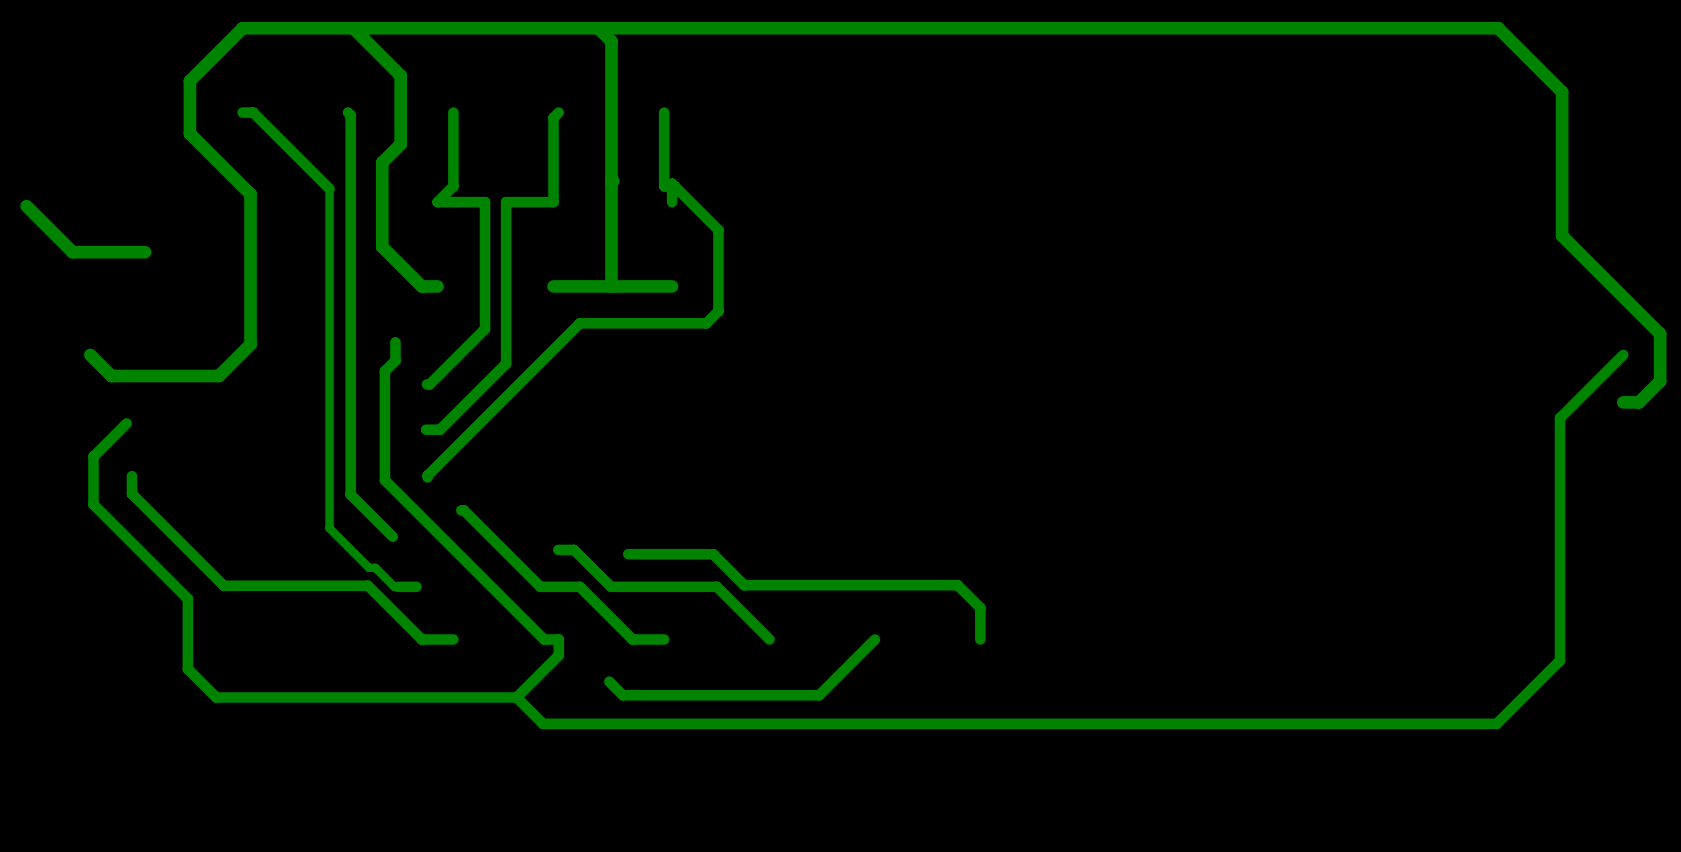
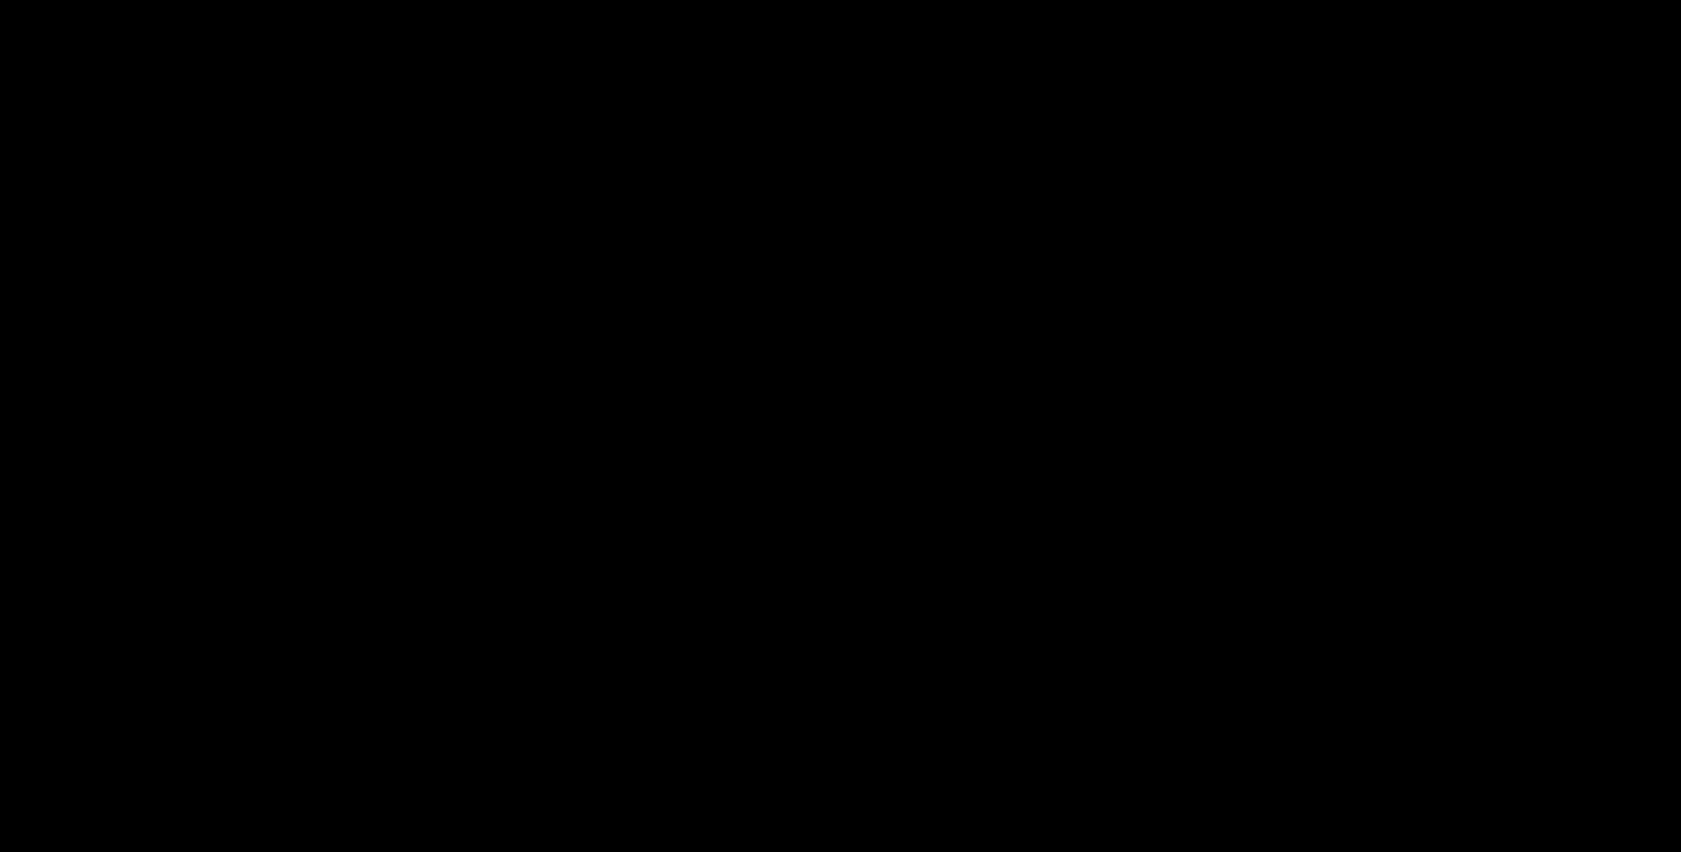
bottom track: (353, 28) (400, 75) (400, 144) (382, 162) (382, 246) (421, 286) (437, 286) -> none
bottom track: (598, 28) (611, 41) (611, 179) (613, 181) (611, 182) (611, 286) -> none
bottom track: (242, 112) (253, 112) (329, 188) (329, 528) (369, 567) (375, 567) (394, 586) (416, 586) -> none
bottom track: (348, 112) (350, 115) (350, 494) (392, 536) -> none
bottom track: (453, 112) (453, 186) (437, 202) (485, 202) (485, 329) (429, 384) (427, 384) -> none
bottom track: (558, 112) (553, 117) (553, 202) (506, 202) (506, 363) (440, 429) (426, 429) -> none
bottom track: (664, 112) (664, 186) (674, 186) -> none
bottom track: (672, 202) (672, 183) (718, 230) (718, 311) (706, 323) (579, 323) (427, 477) -> none
bottom track: (26, 206) (72, 252) (145, 252) -> none
bottom track: (553, 286) (672, 286) -> none
bottom track: (395, 342) (395, 360) (384, 371) (384, 480) (544, 639) (558, 639) (558, 655) (516, 697) -> none
bottom track: (90, 354) (111, 376) (218, 376) (250, 344) (250, 194) (189, 133) (189, 80) (242, 28) (1498, 28) (1562, 92) (1562, 235) (1660, 333) (1660, 381) (1639, 402) (1623, 402) -> none
bottom track: (1623, 354) (1560, 418) (1560, 660) (1496, 723) (542, 723) (516, 697) -> none
bottom track: (126, 423) (93, 456) (93, 504) (187, 598) (187, 669) (216, 697) (516, 697) -> none
bottom track: (131, 476) (131, 493) (223, 585) (368, 585) (421, 639) (453, 639) -> none
bottom track: (461, 510) (463, 510) (540, 586) (579, 586) (632, 639) (664, 639) -> none
bottom track: (558, 549) (574, 549) (610, 586) (716, 586) (769, 639) -> none
bottom track: (628, 554) (713, 554) (744, 585) (957, 585) (980, 607) (980, 639) -> none
bottom track: (874, 639) (819, 695) (622, 695) (609, 681) -> none

